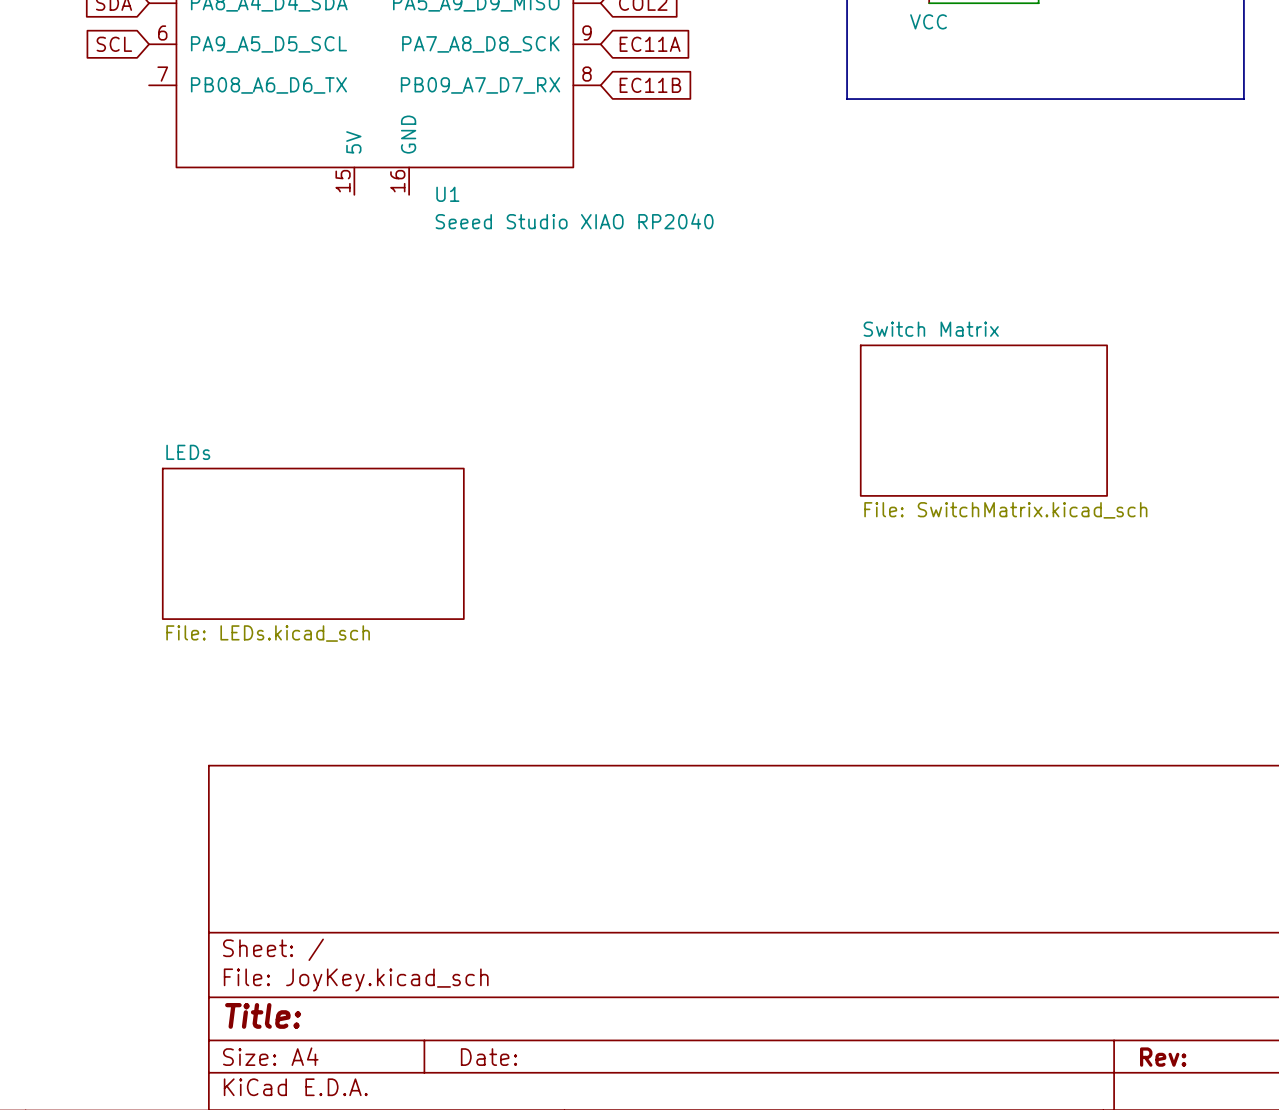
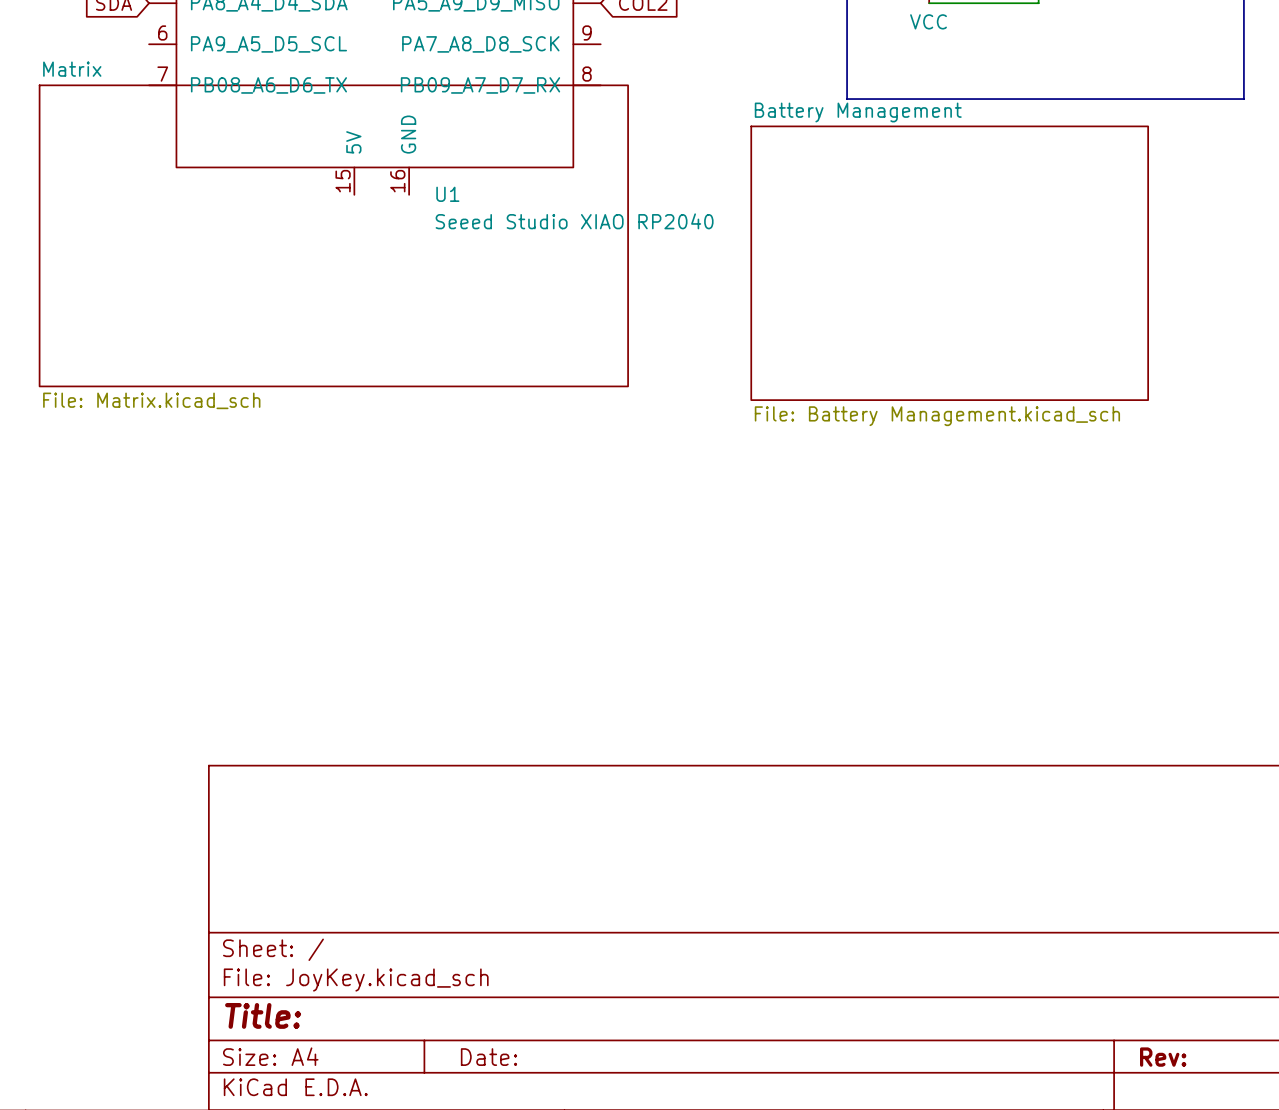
global label: SCL (114, 44) -> none
global label: EC11A (650, 44) -> none
global label: EC11B (650, 85) -> none
sheet Matrix: none -> File: Matrix.kicad_sch (333, 235)
sheet Battery Management: none -> File: Battery Management.kicad_sch (949, 263)
sheet Switch Matrix: File: SwitchMatrix.kicad_sch (983, 420) -> none
sheet LEDs: File: LEDs.kicad_sch (313, 543) -> none

